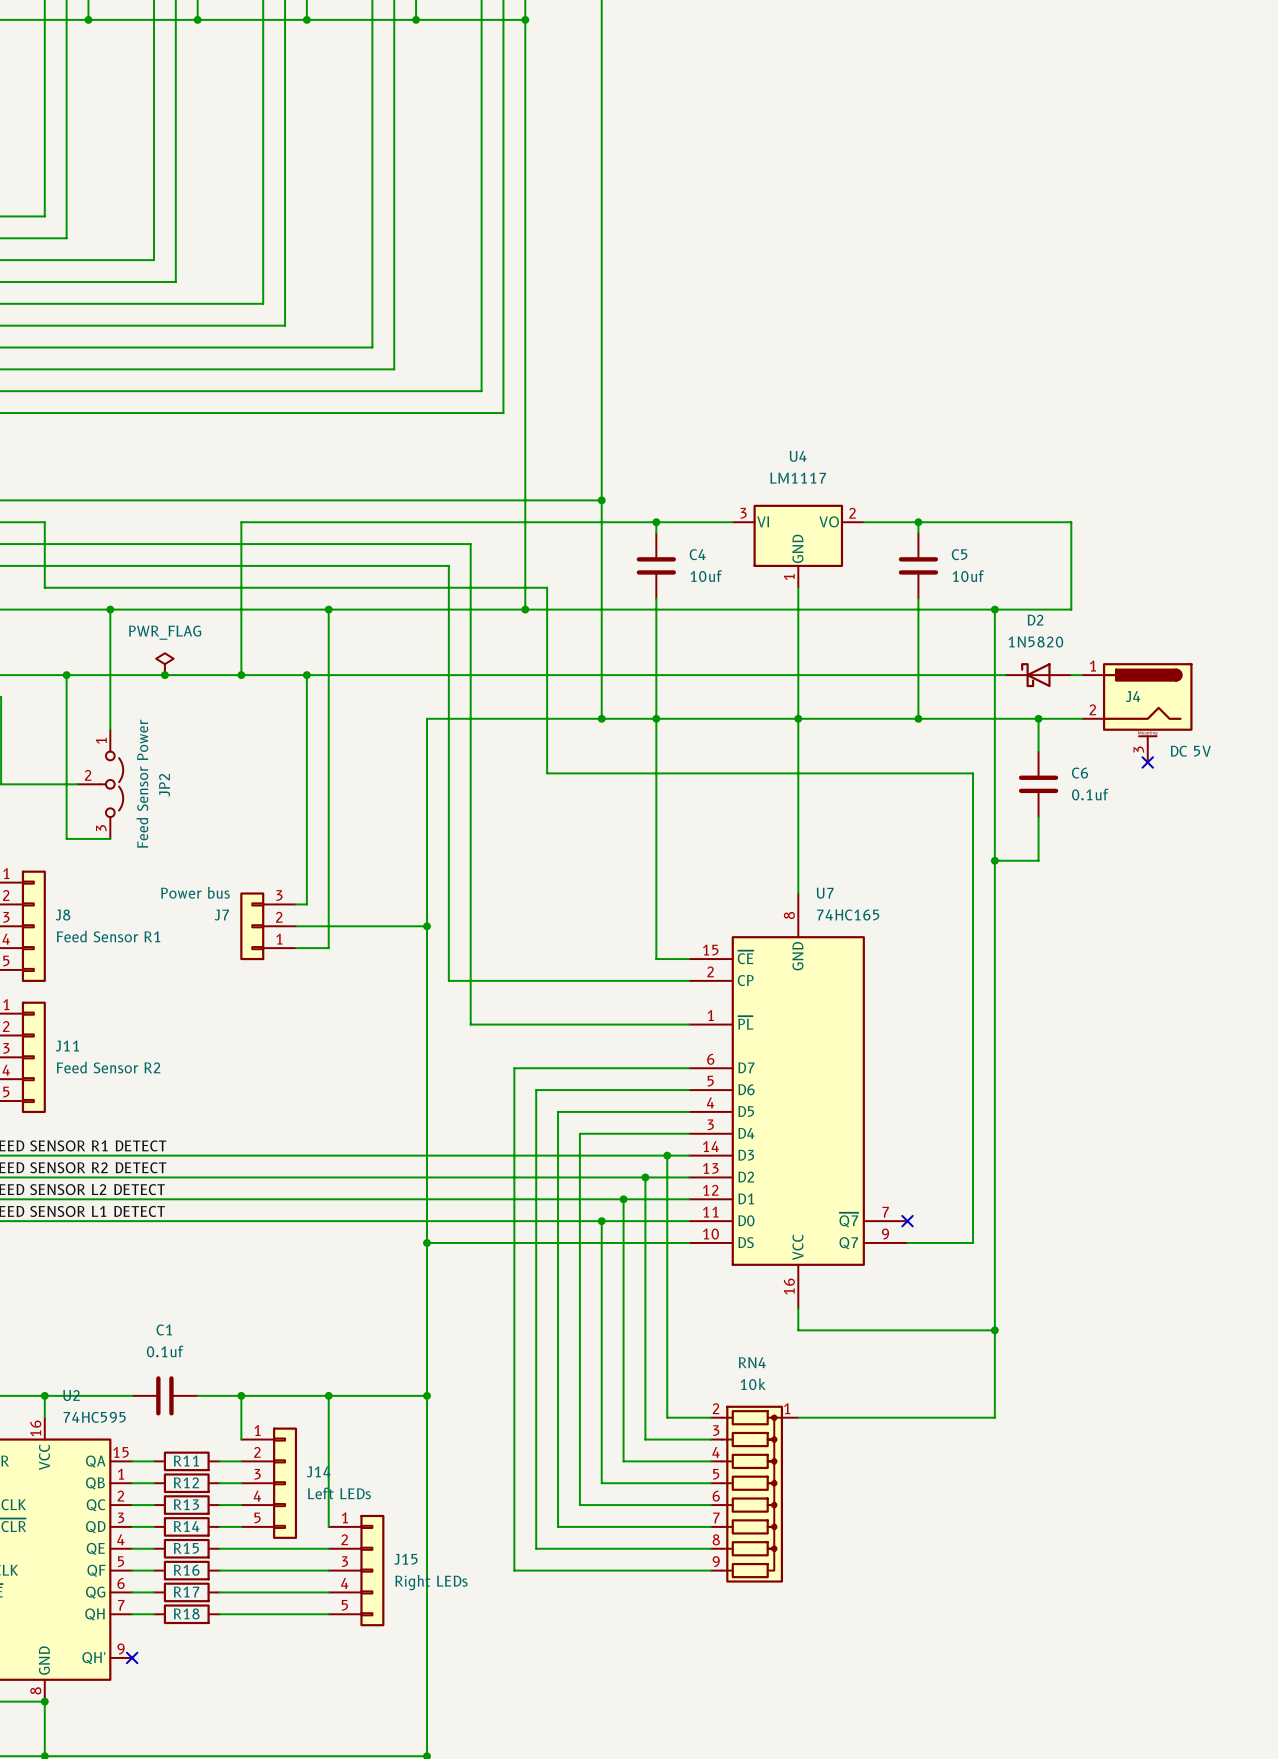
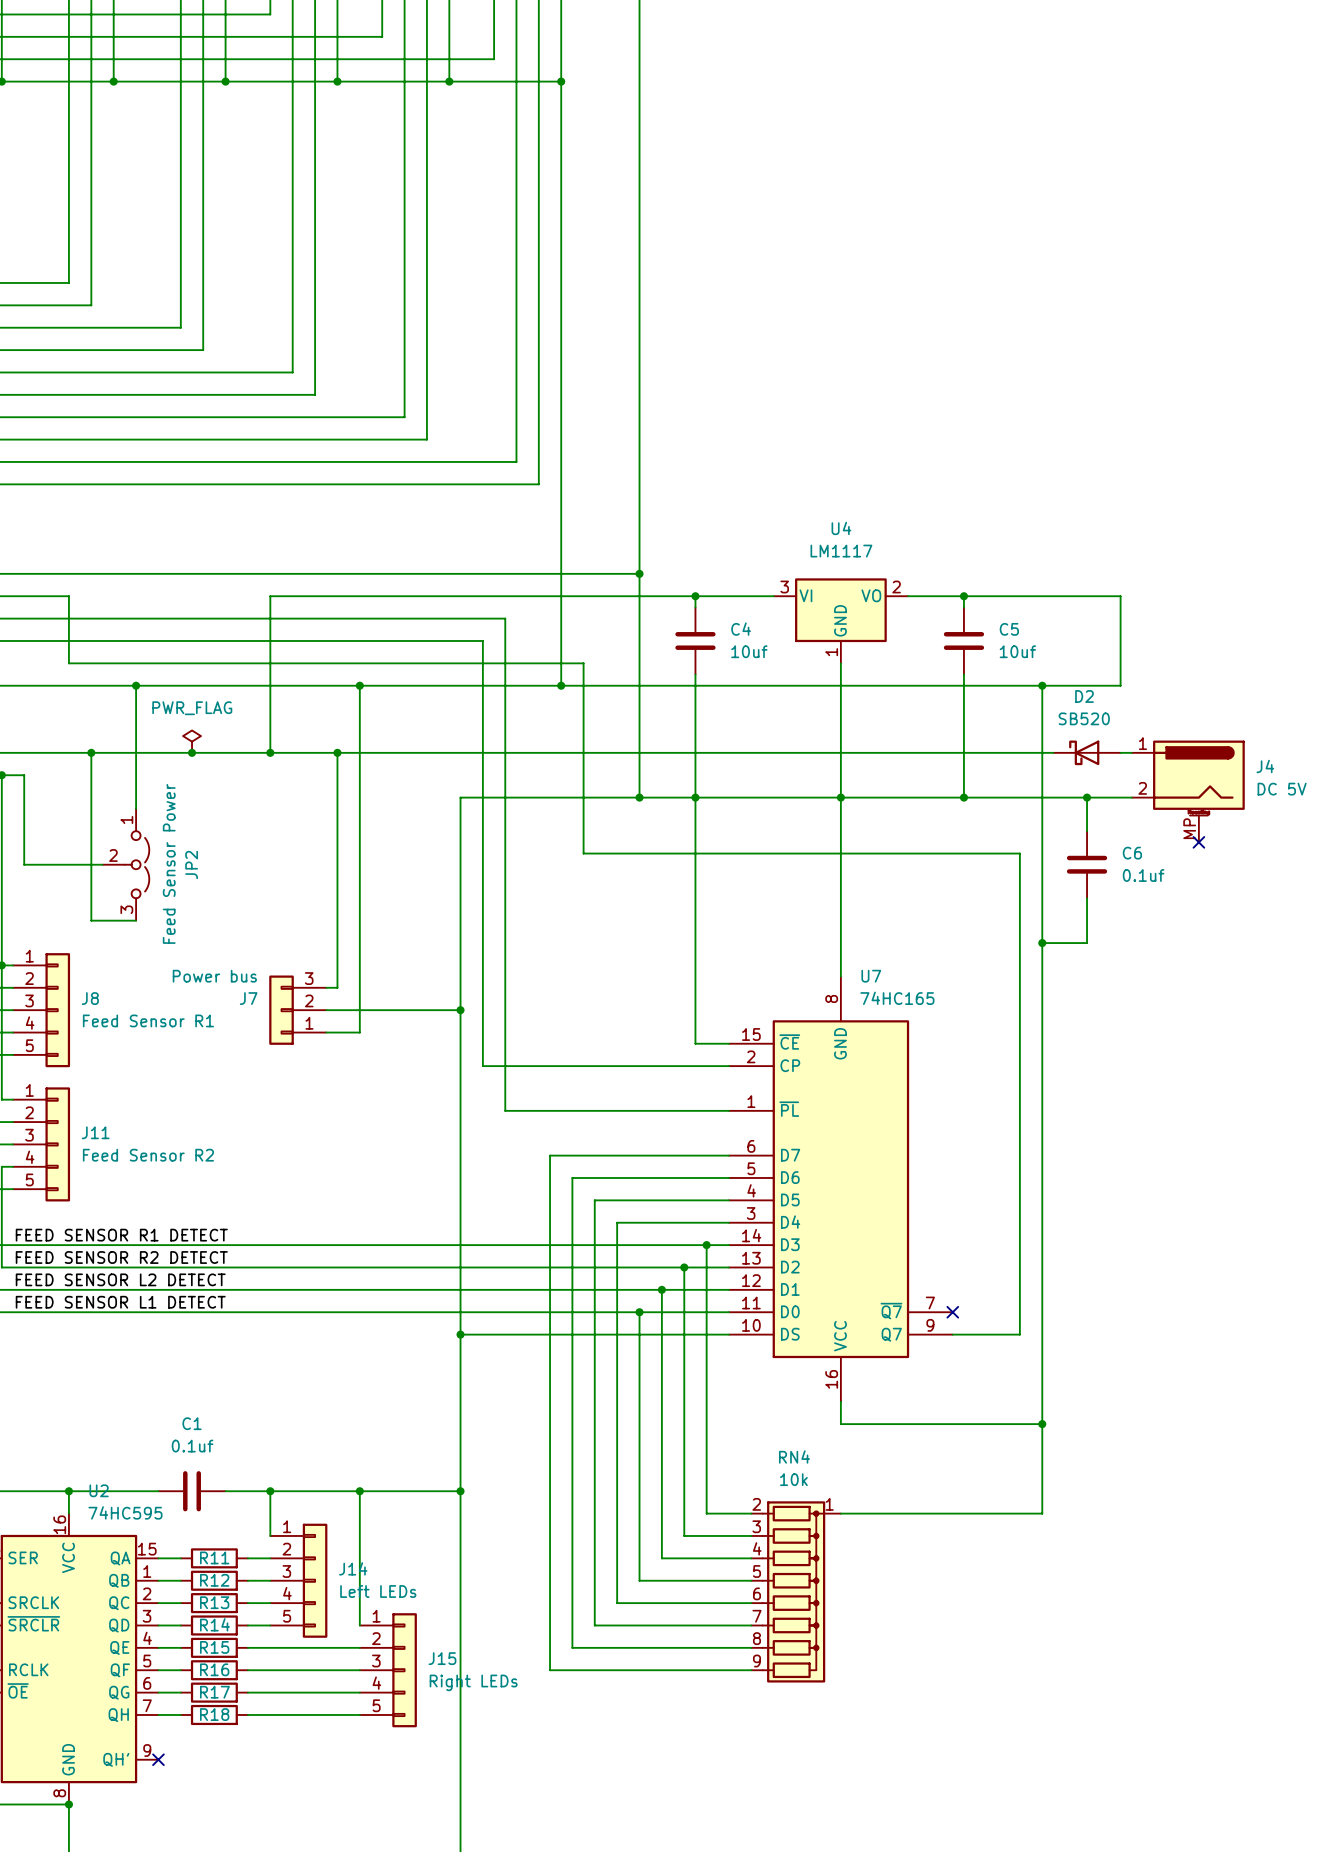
D2 value: 1N5820 (1035, 642) -> SB520 (1084, 718)
J4 name position: J4 (1133, 696) -> J4 (1265, 766)
J4 pin number: 3 (1138, 749) -> MP (1189, 828)
J4 value position: DC 5V (1190, 751) -> DC 5V (1282, 789)

